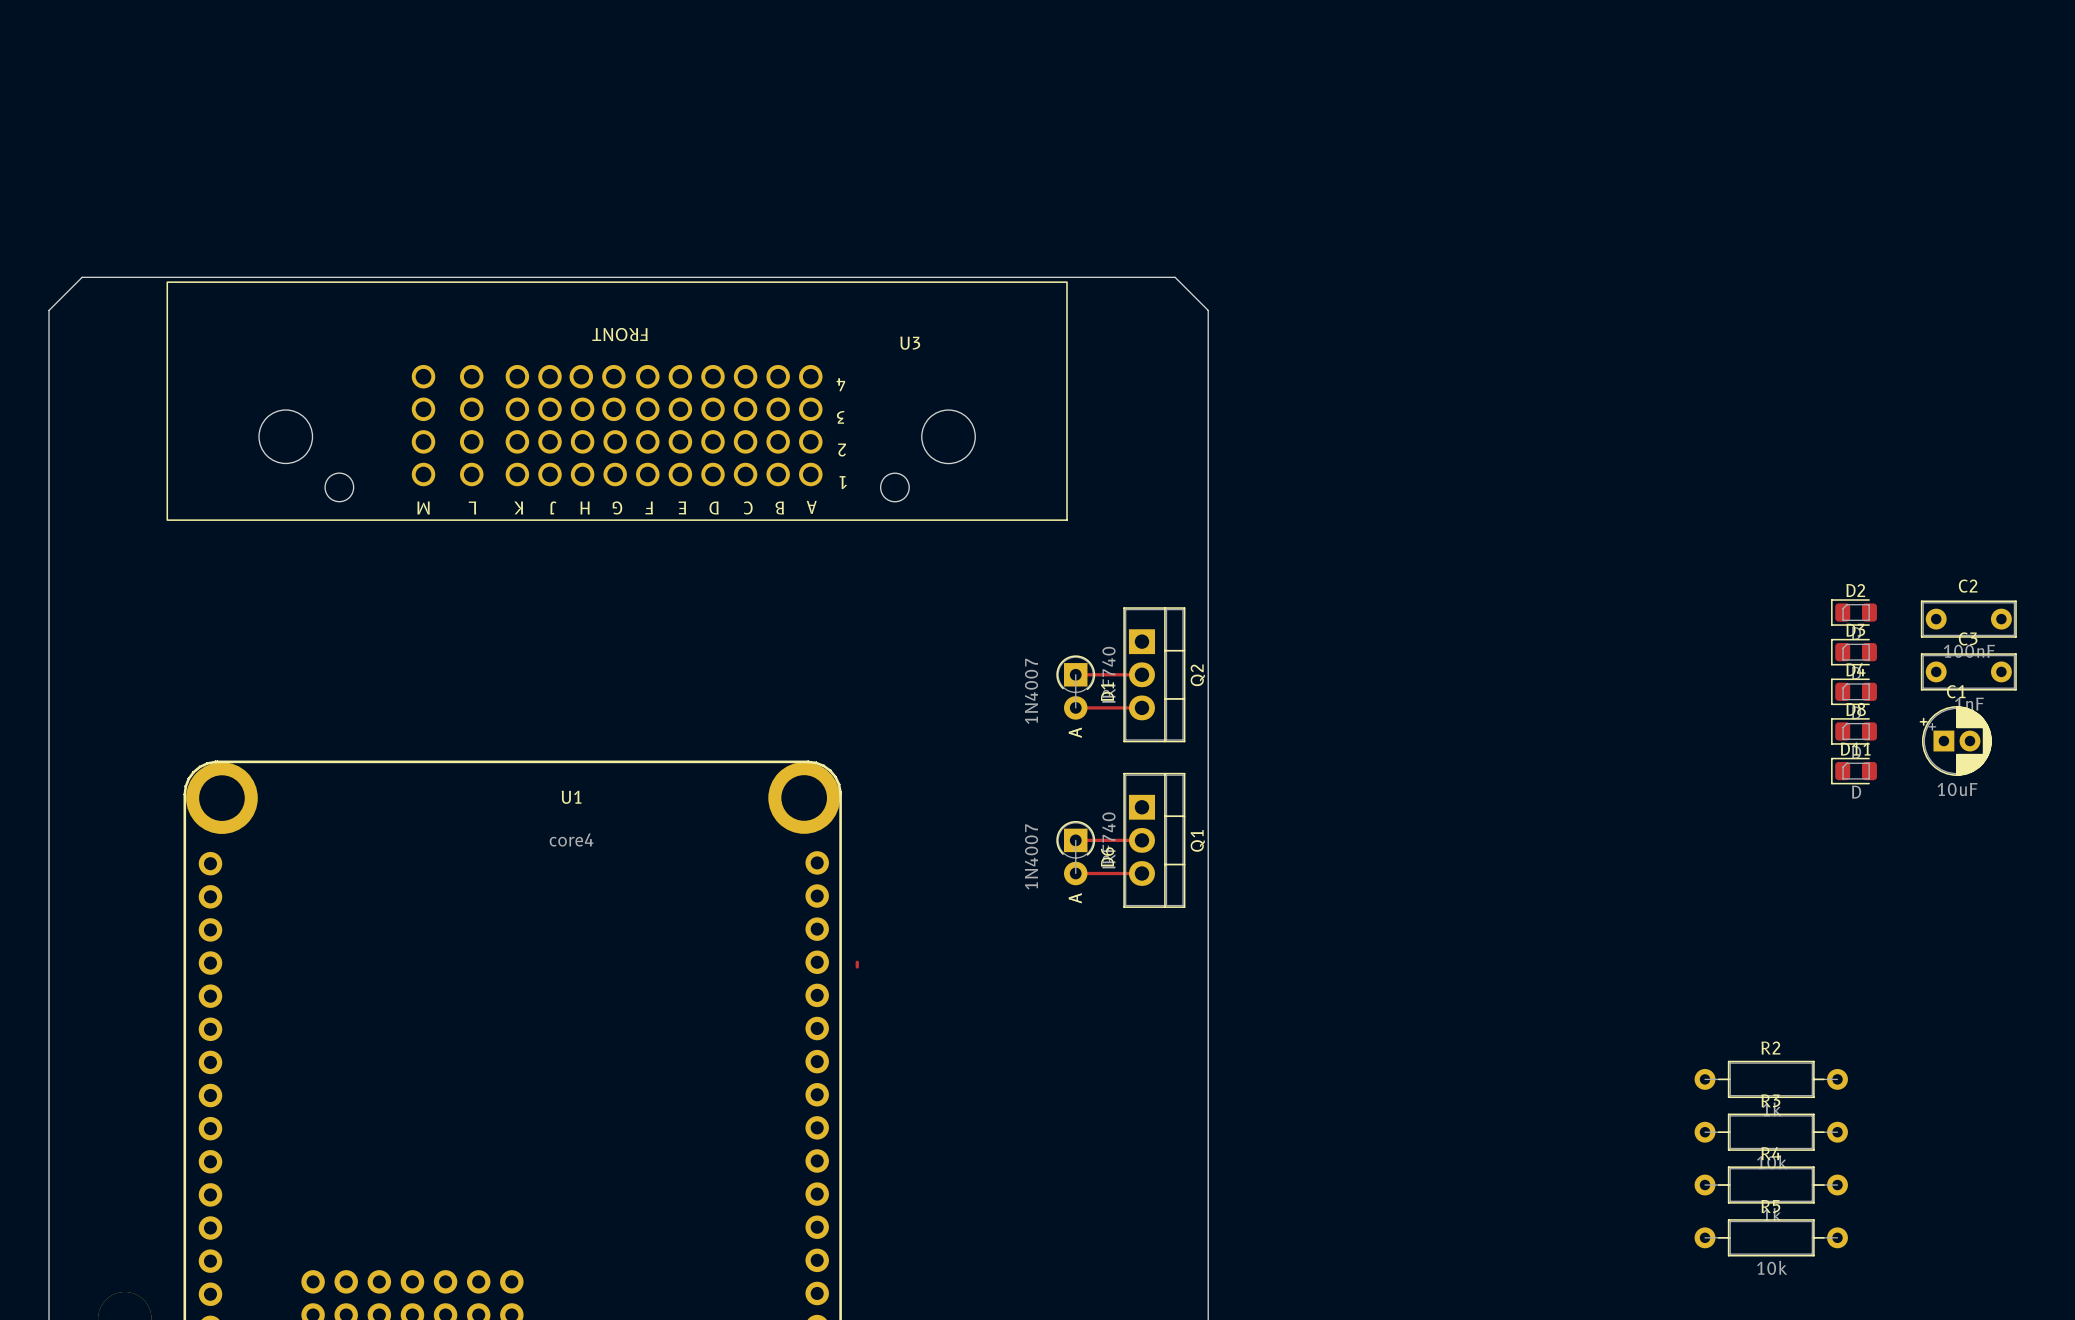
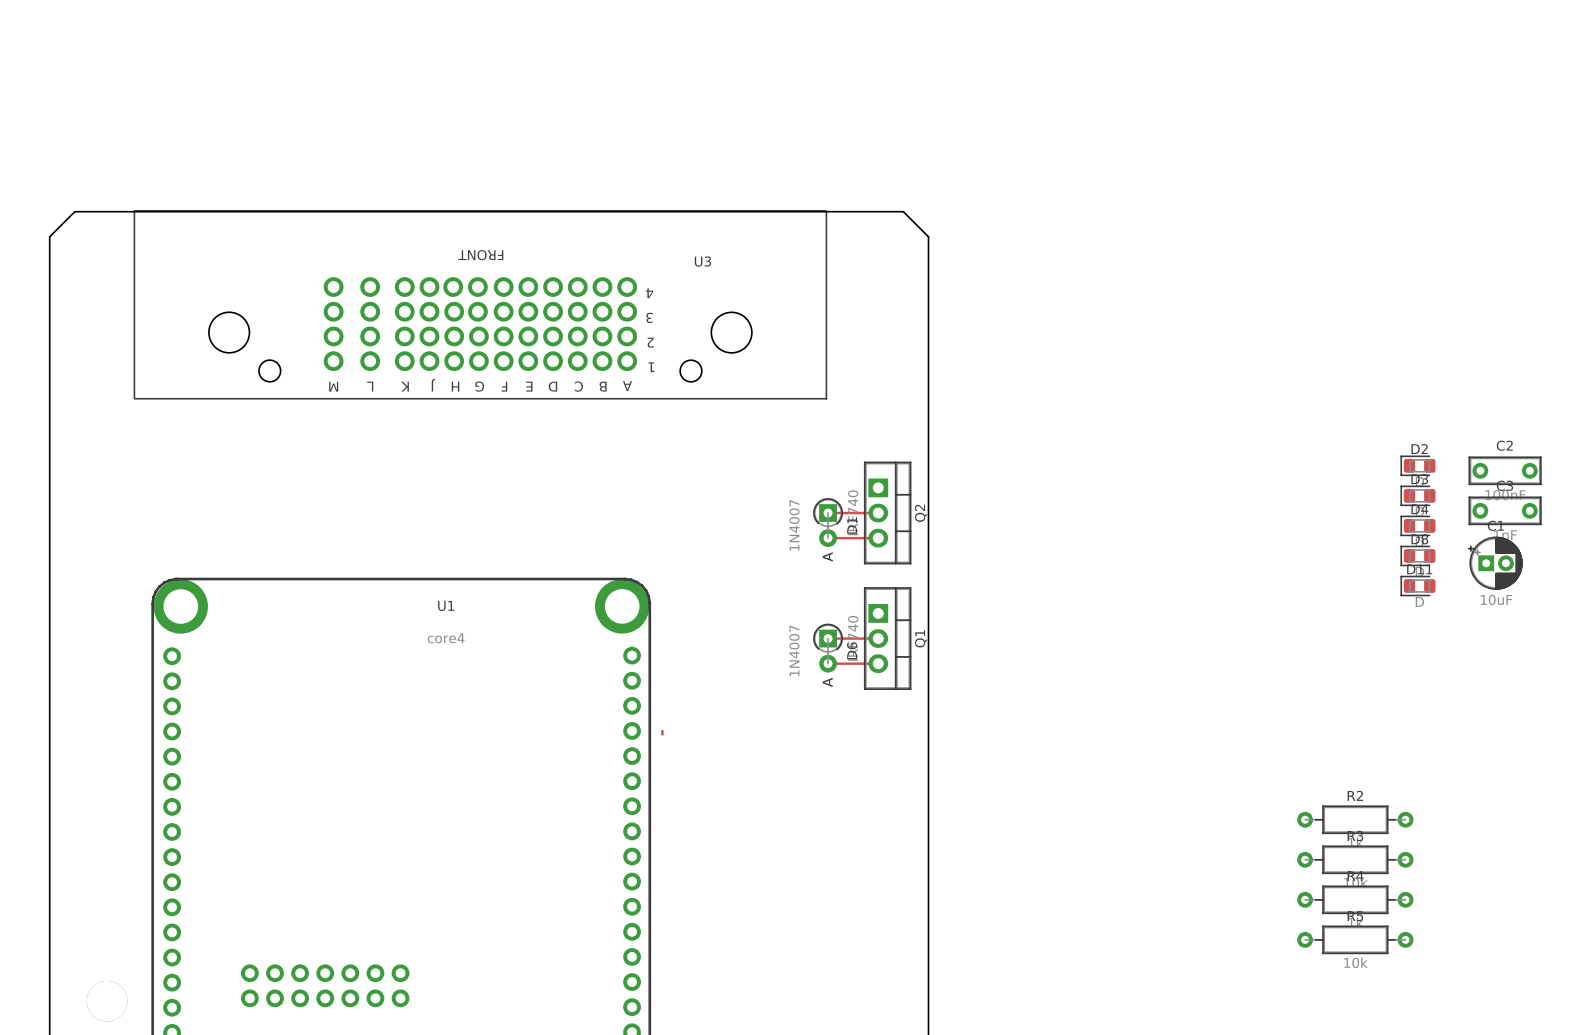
U3 footprint: [166, 281, 1068, 521] -> [133, 210, 827, 400]

